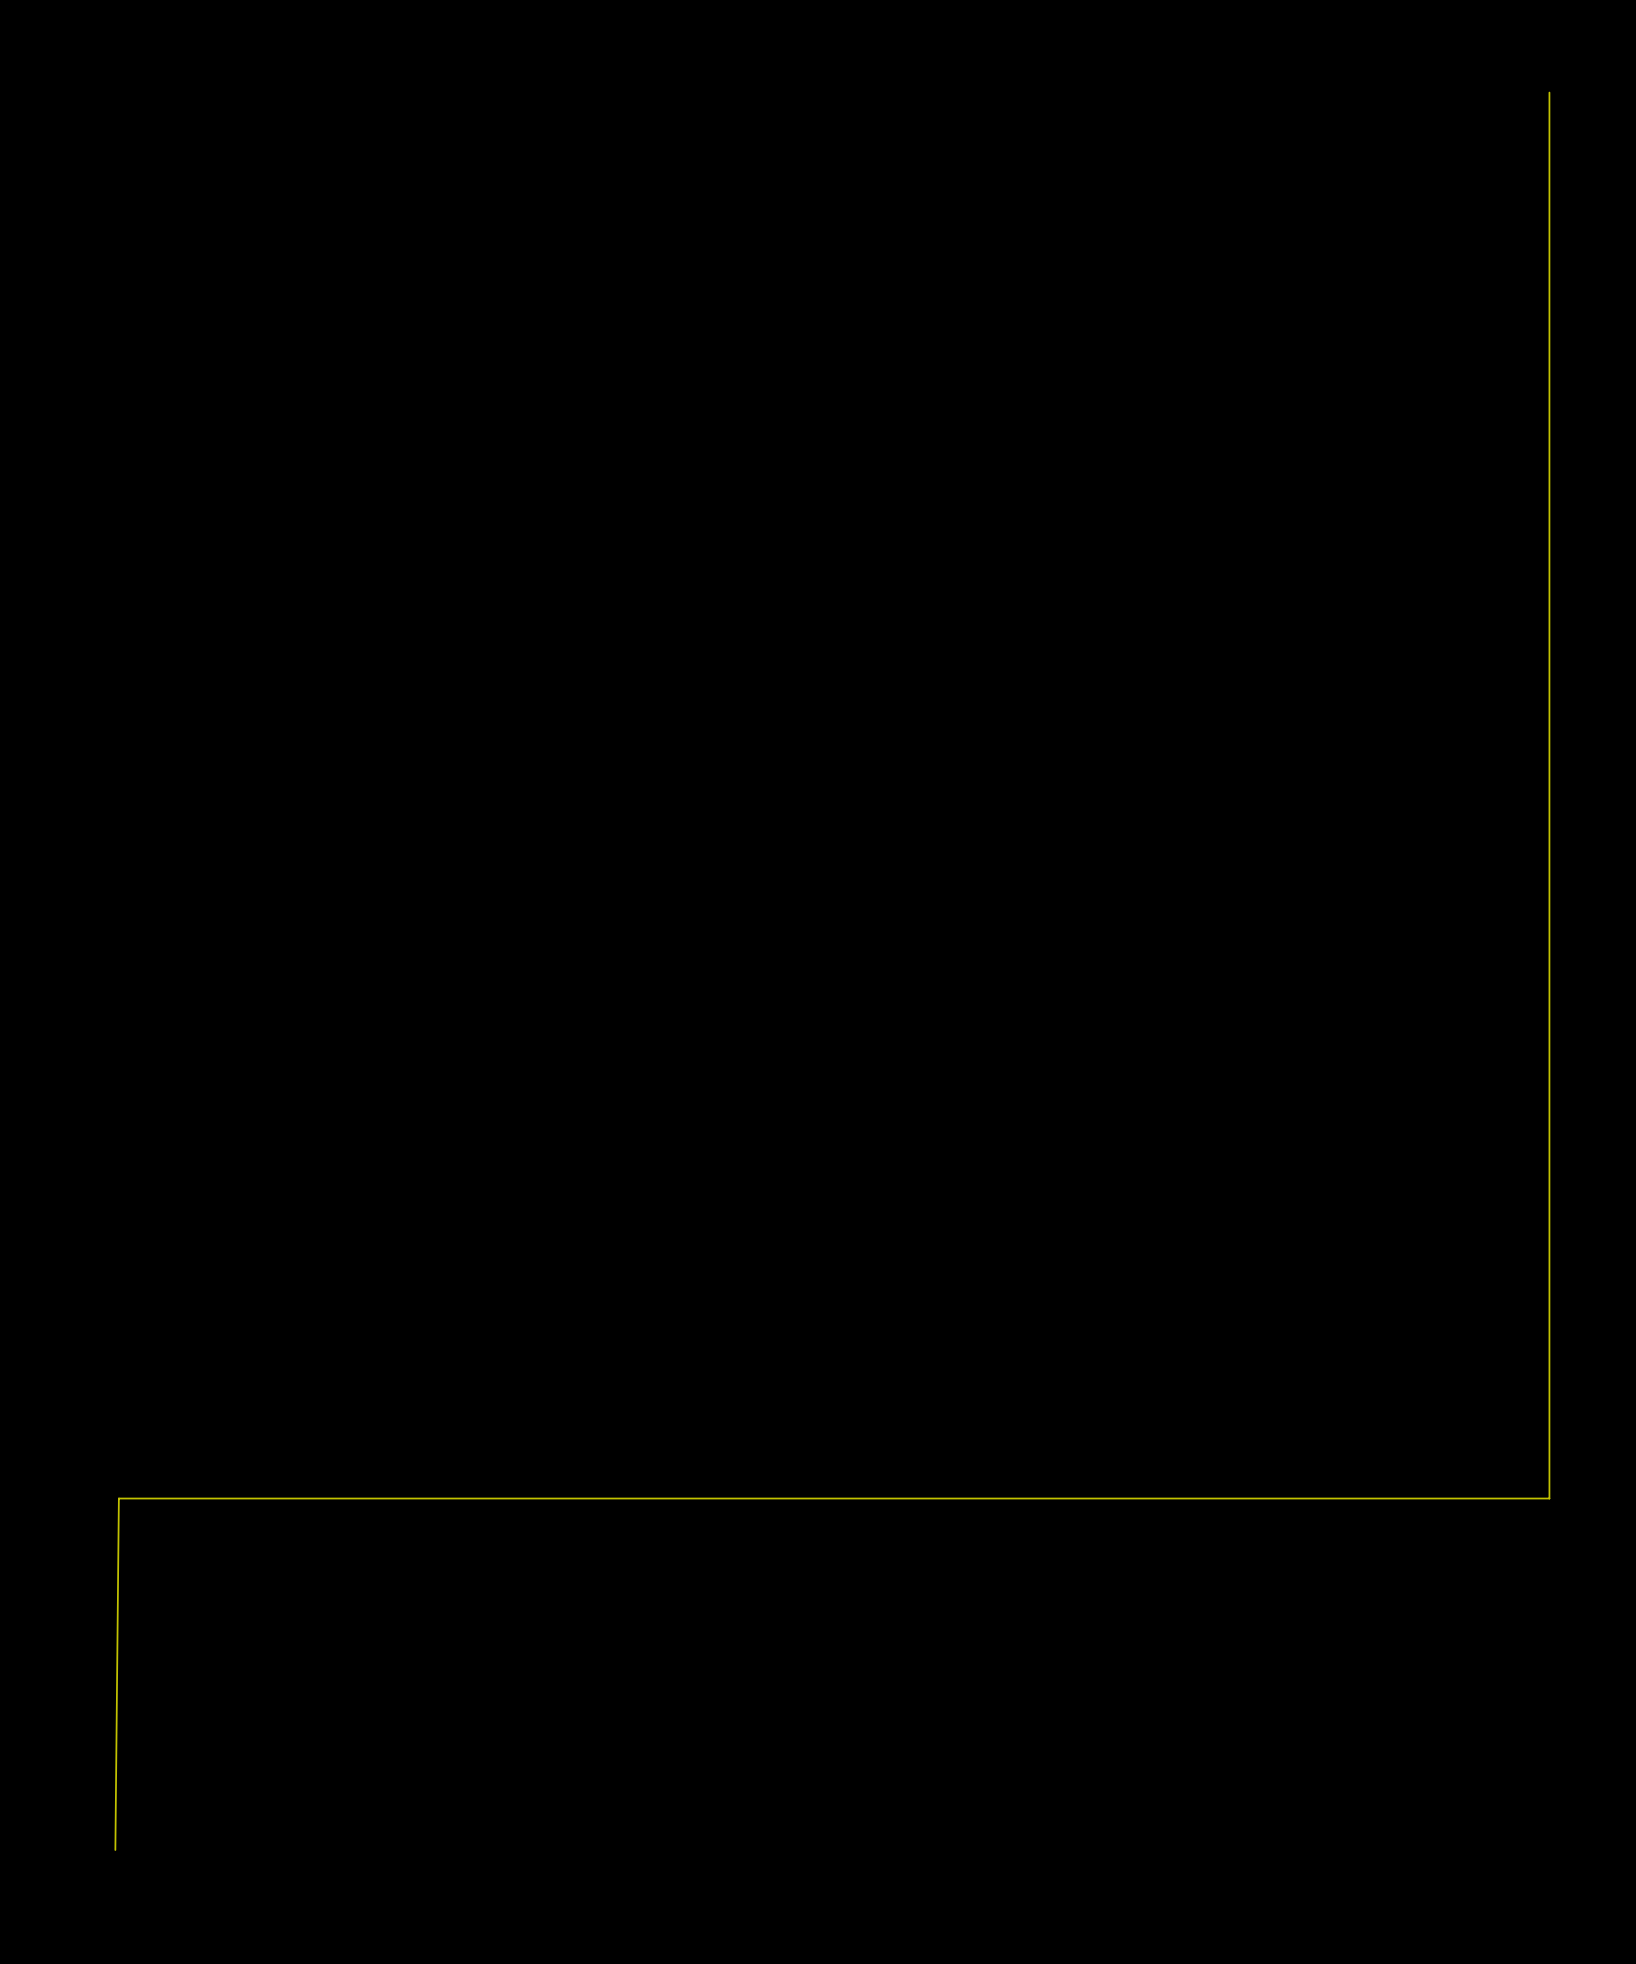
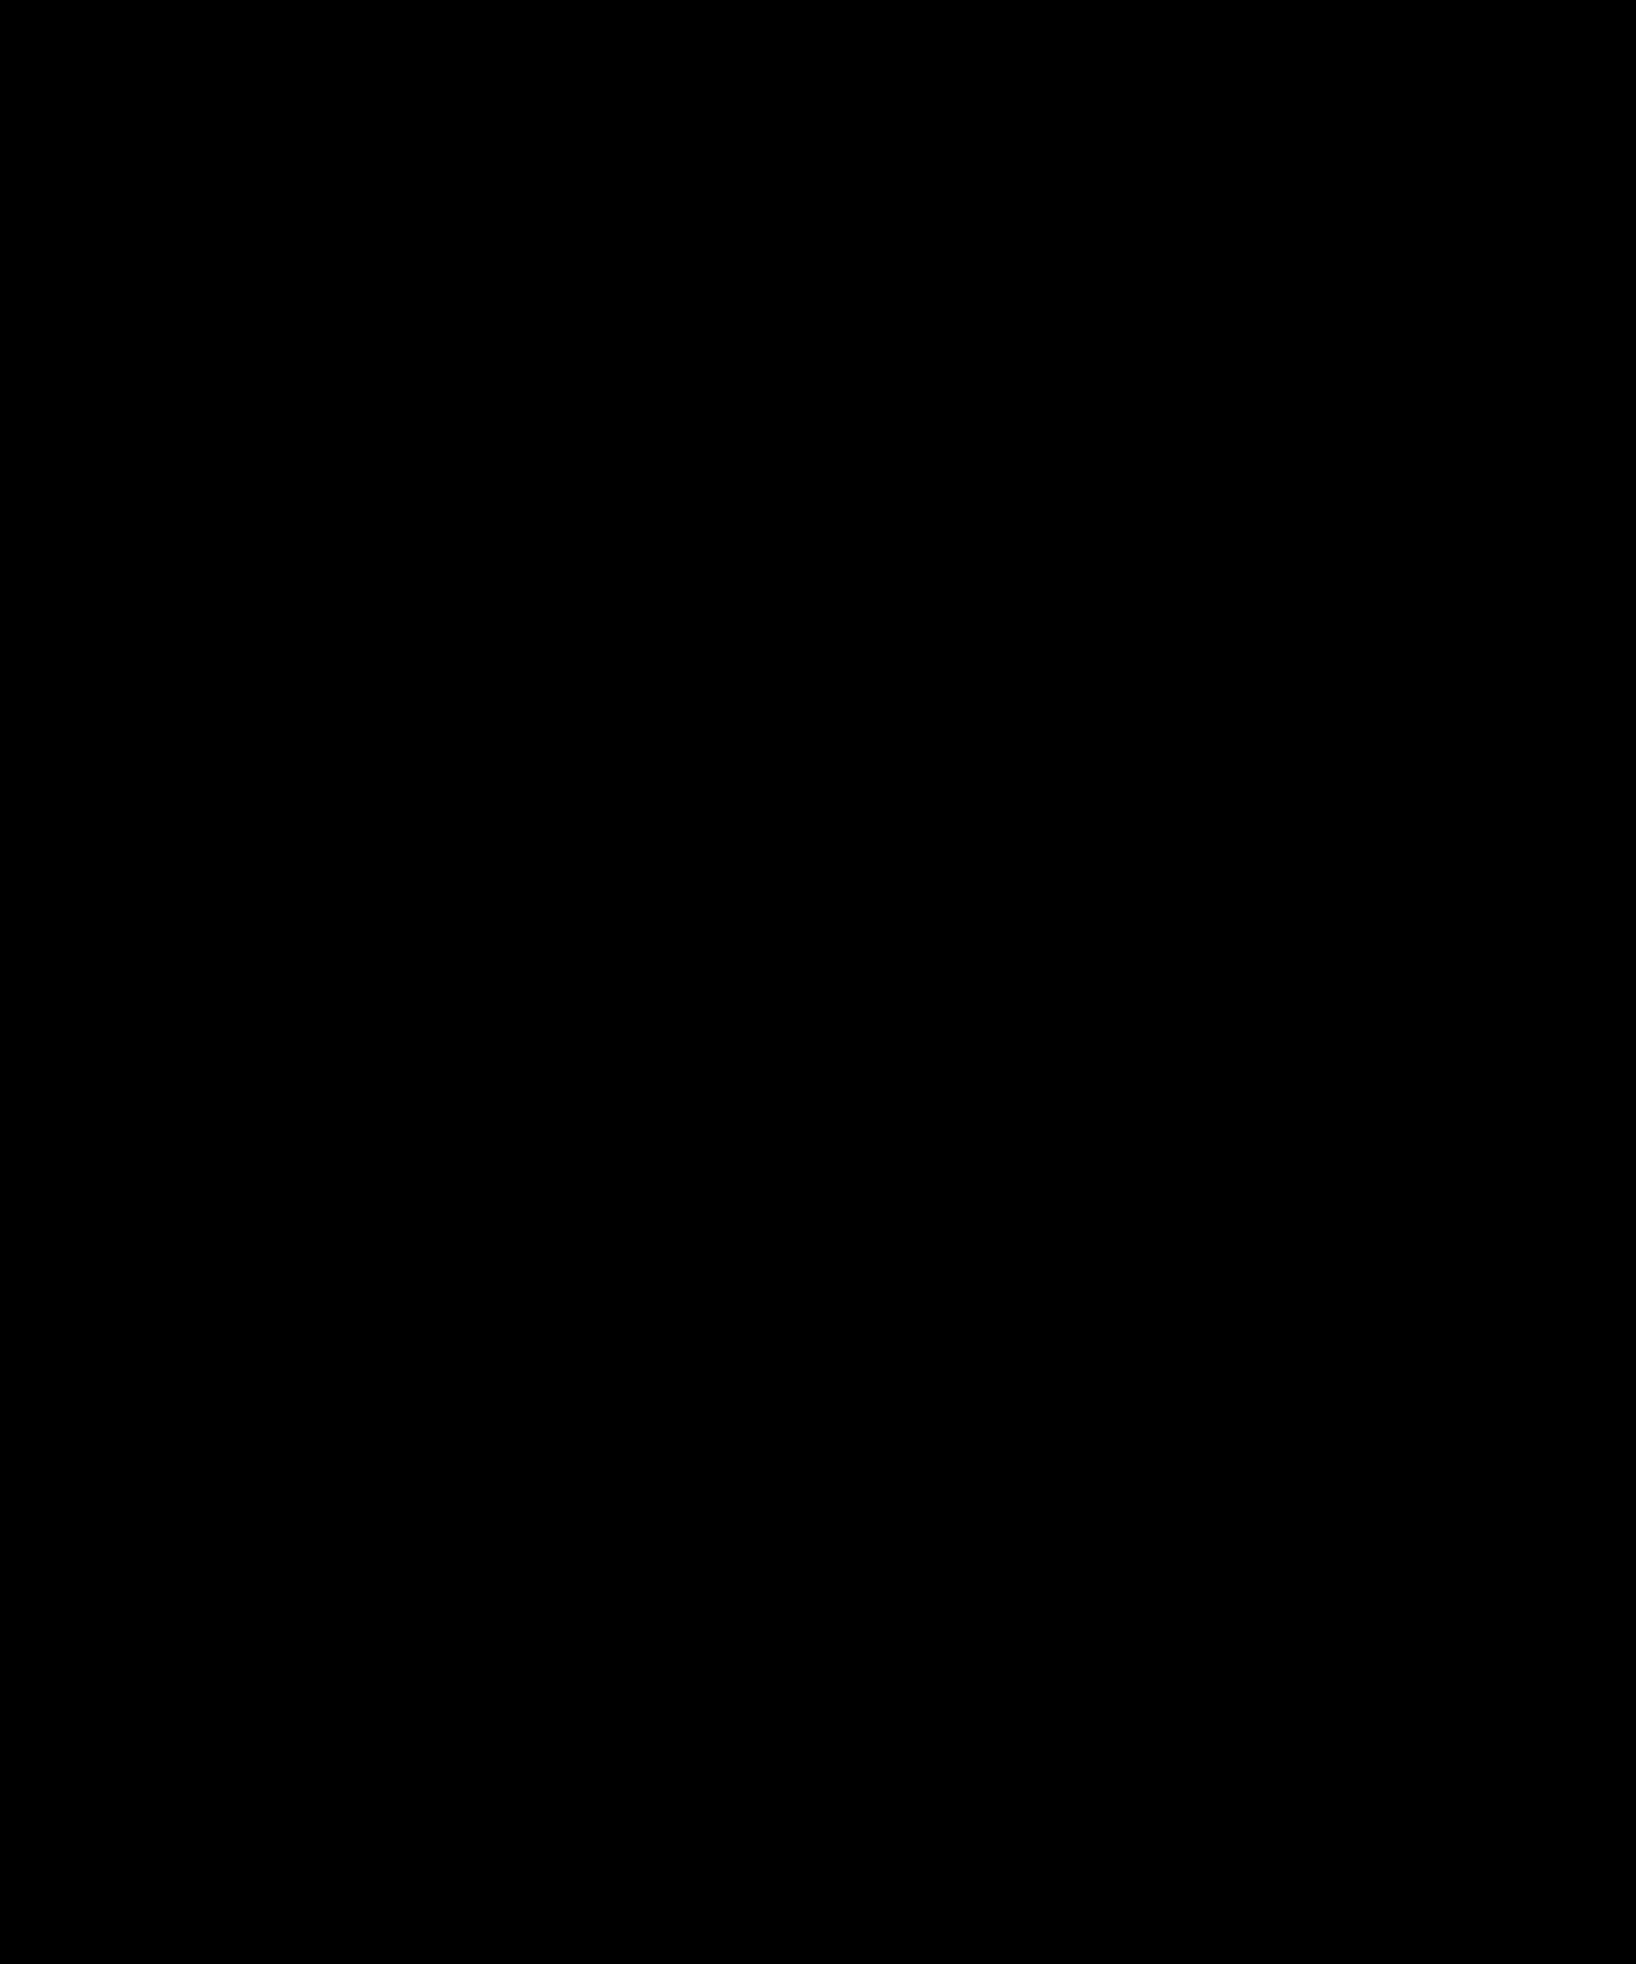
board edge: (1549, 92) (1549, 1498) (118, 1498) (115, 1850) -> none

